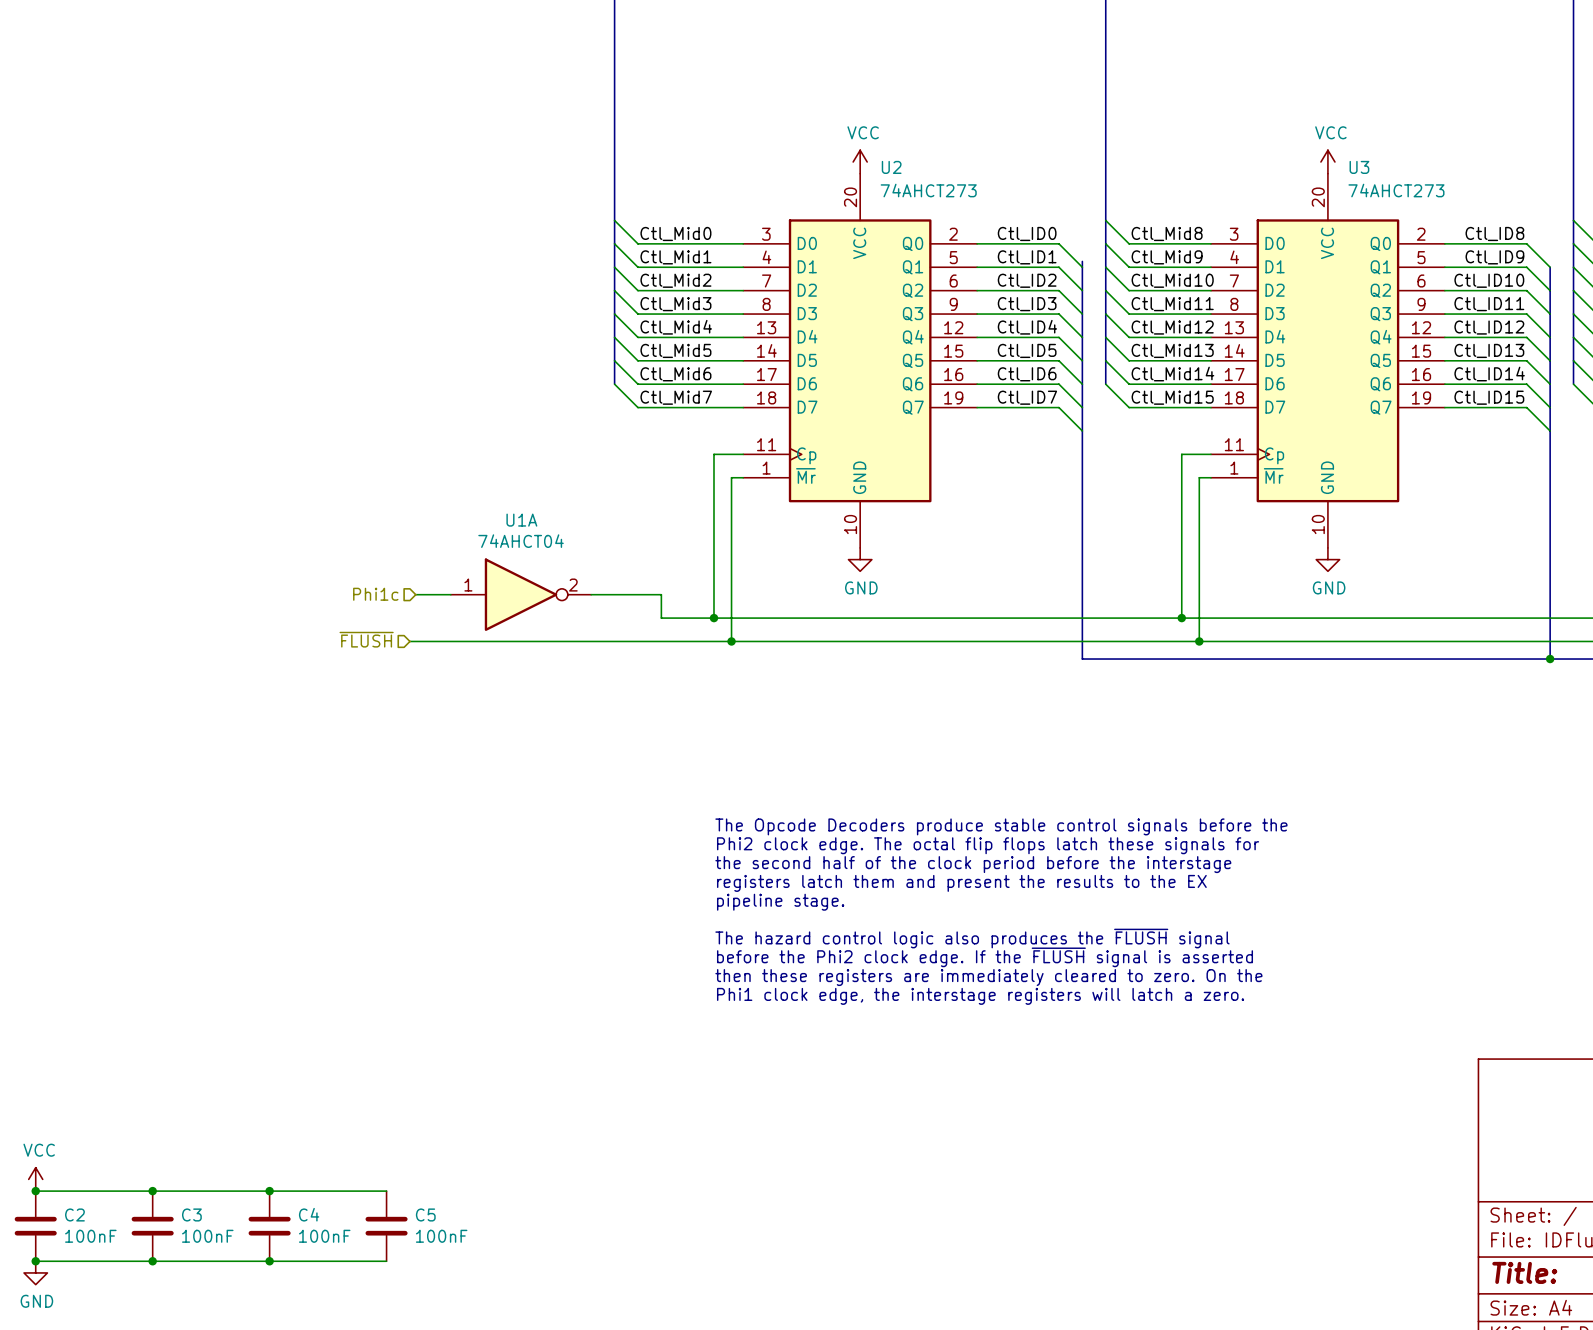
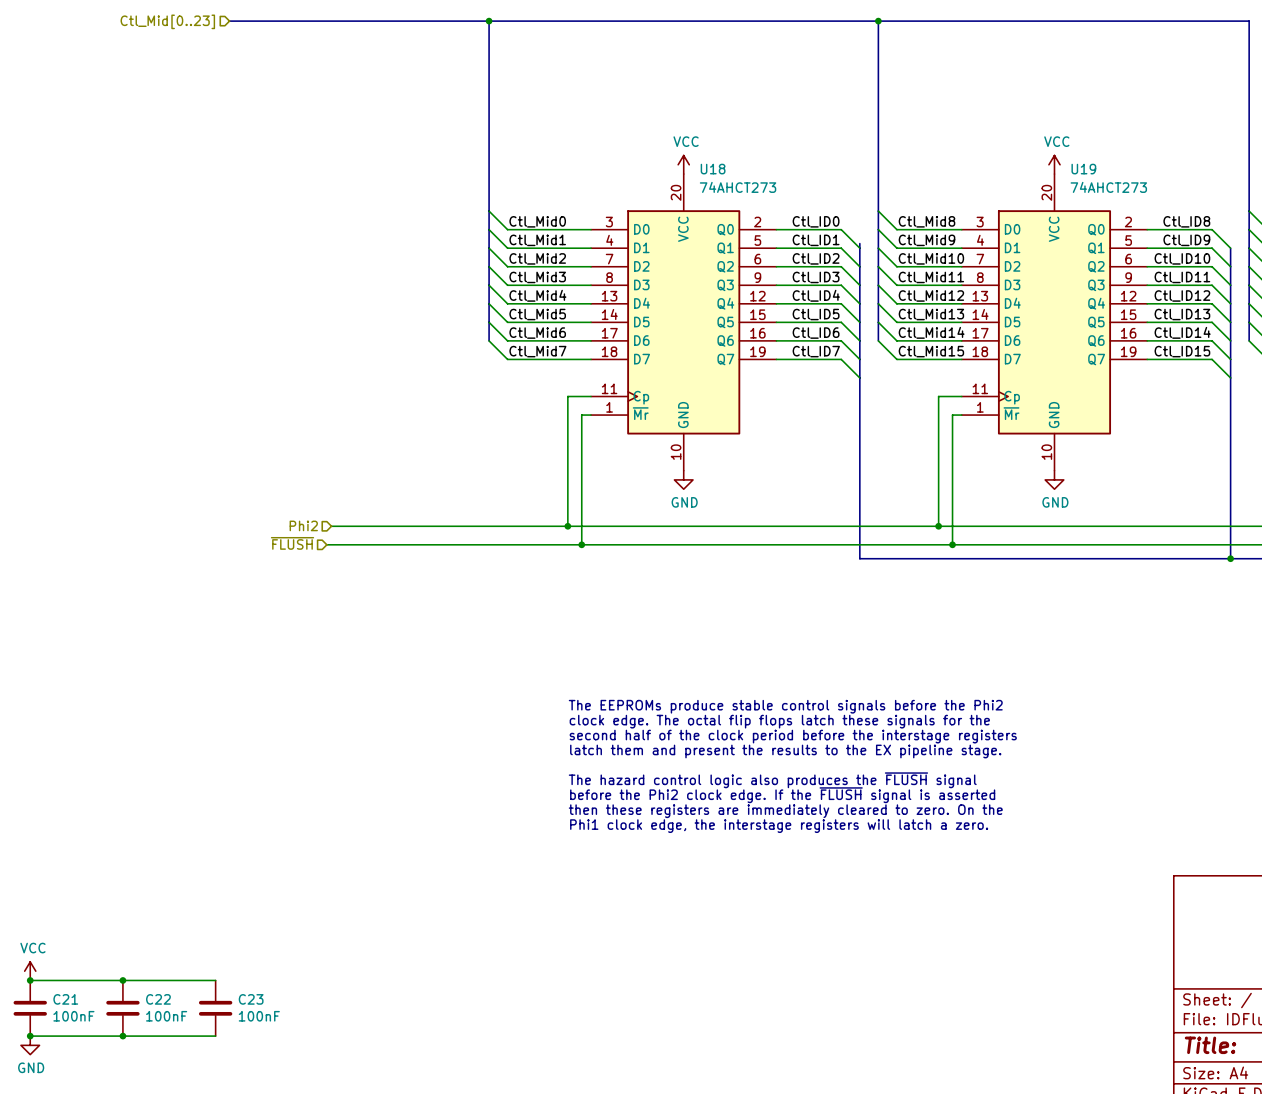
U2 name: U2 (891, 167) -> U18 (713, 169)
U3 name: U3 (1359, 167) -> U19 (1083, 169)
hierarchical label: Phi1c (375, 594) -> Phi2 (303, 525)
wire: (415, 594) (450, 594) -> none
U1A: 74AHCT04 (521, 594) -> none
wire: (591, 594) (661, 594) (661, 618) -> (331, 526) (526, 526)
text: The Opcode Decoders produce stable control signals before the (1001, 826) -> none
text: Phi2 clock edge. The octal flip flops latch these signals for (988, 845) -> The EEPROMs produce stable control signals before the Phi2 (785, 706)
text: the second half of the clock period before the interstage (973, 864) -> clock edge. The octal flip flops latch these signals for the (779, 721)
text: registers latch them and present the results to the EX (961, 883) -> second half of the clock period before the interstage registers (793, 736)
text: pipeline stage. (780, 902) -> latch them and present the results to the EX pipeline stage. (785, 751)
wire: (269, 1191) (386, 1191) -> none
junction: (269, 1191) -> none
C2 name: C2 (74, 1214) -> C21 (65, 999)
C3 name: C3 (191, 1214) -> C22 (158, 999)
C4 name: C4 (309, 1214) -> C23 (251, 999)
C5: 100nF (386, 1226) -> none
wire: (269, 1261) (386, 1261) -> none
junction: (269, 1261) -> none

